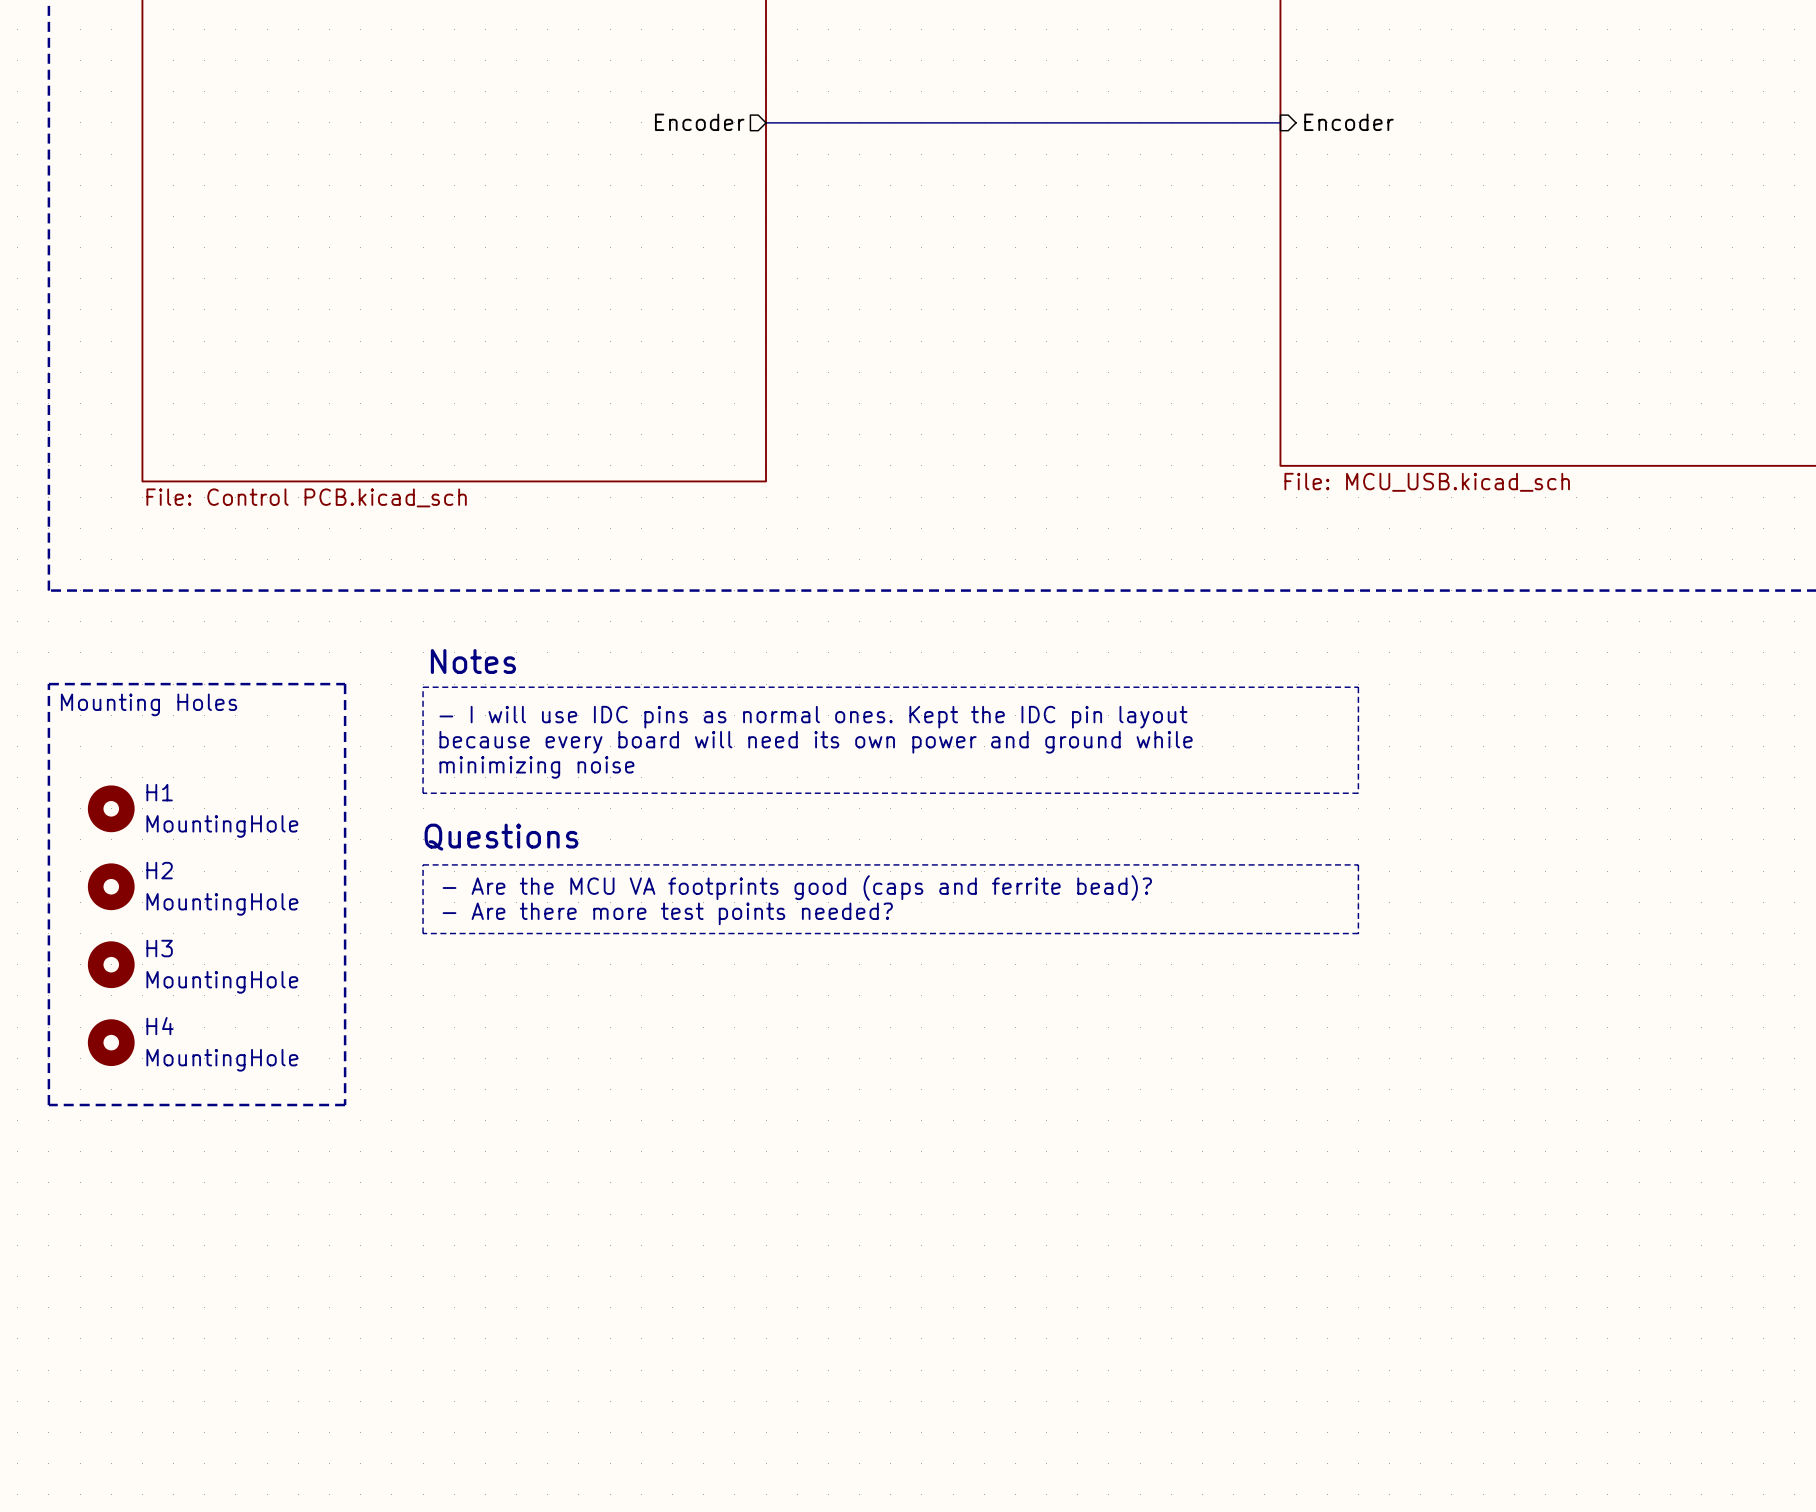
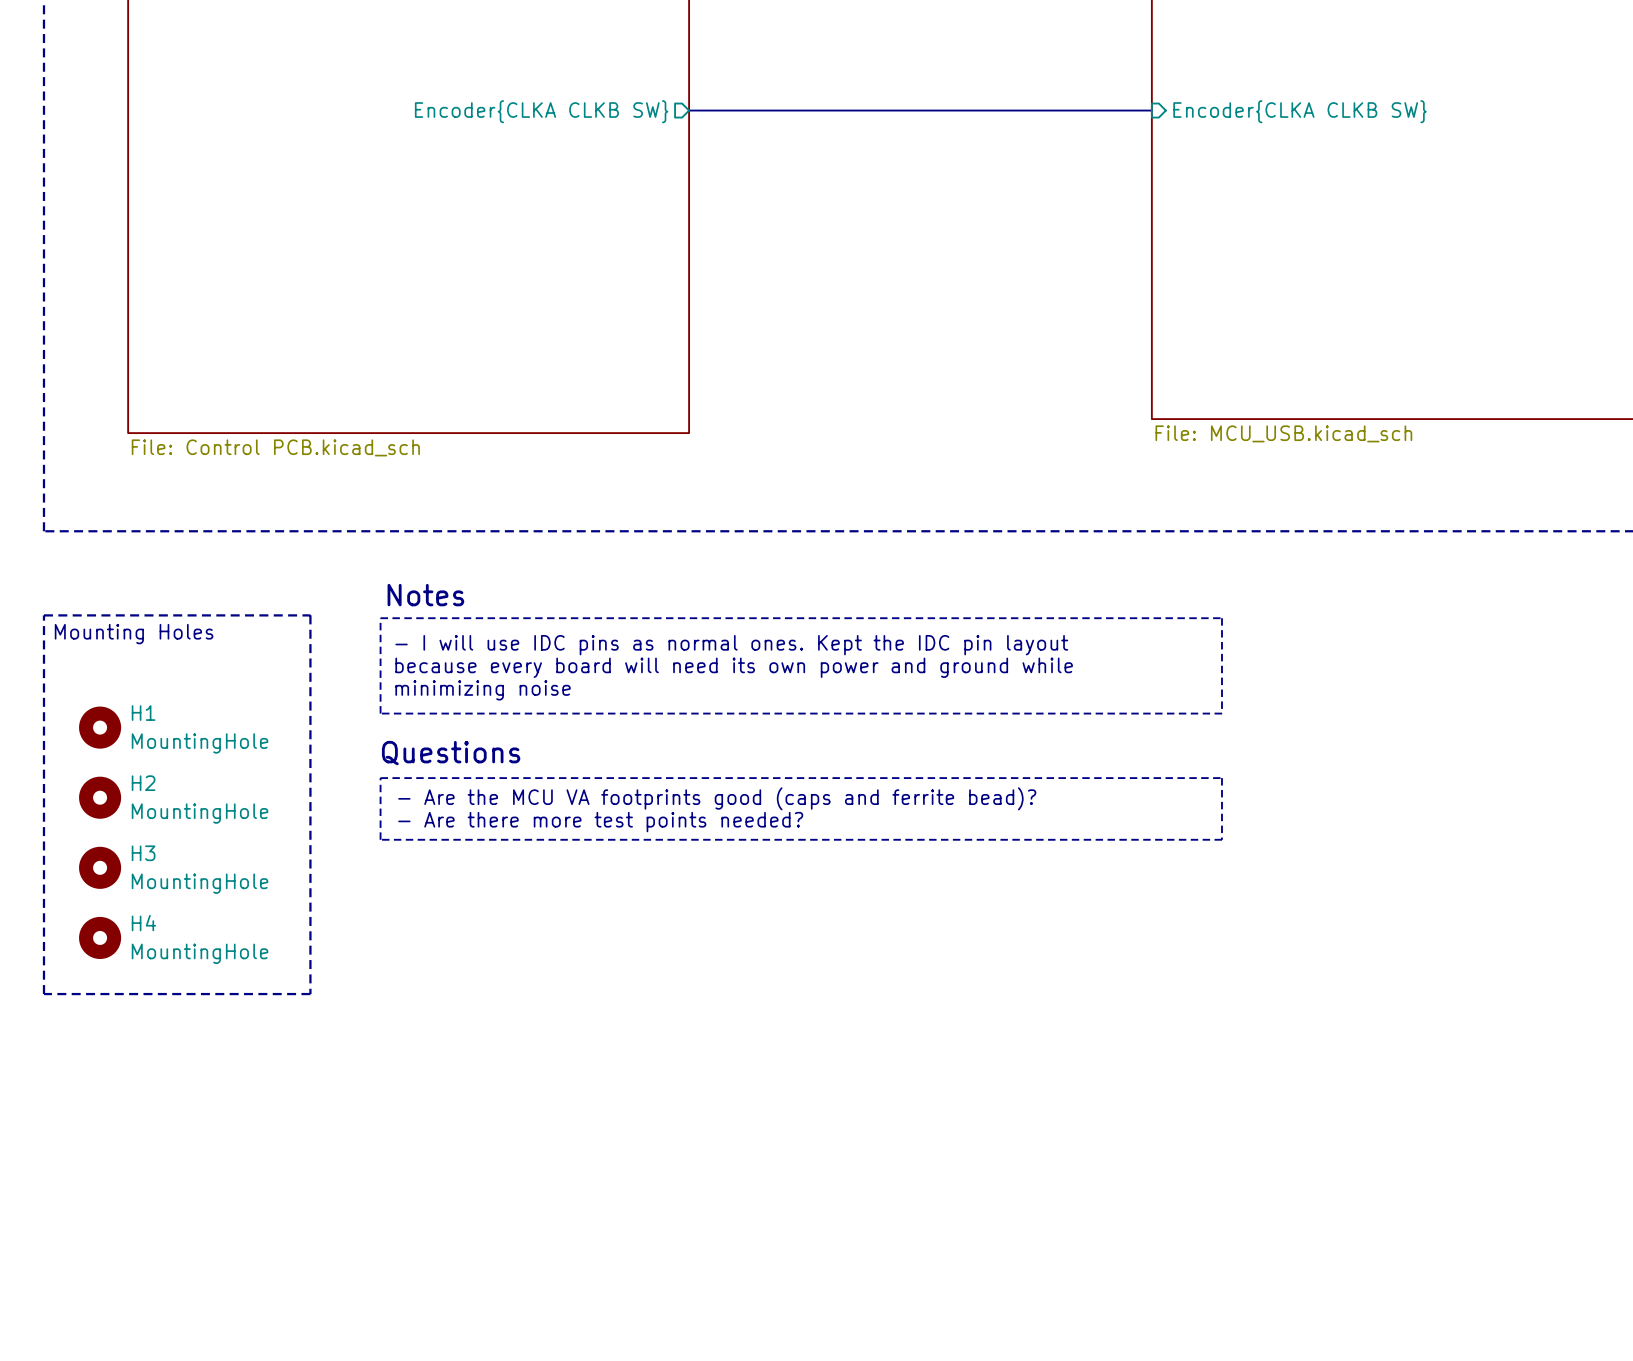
sheet pin: Encoder (699, 122) -> Encoder{CLKA CLKB SW} (541, 111)
sheet pin: Encoder (1348, 122) -> Encoder{CLKA CLKB SW} (1300, 111)

